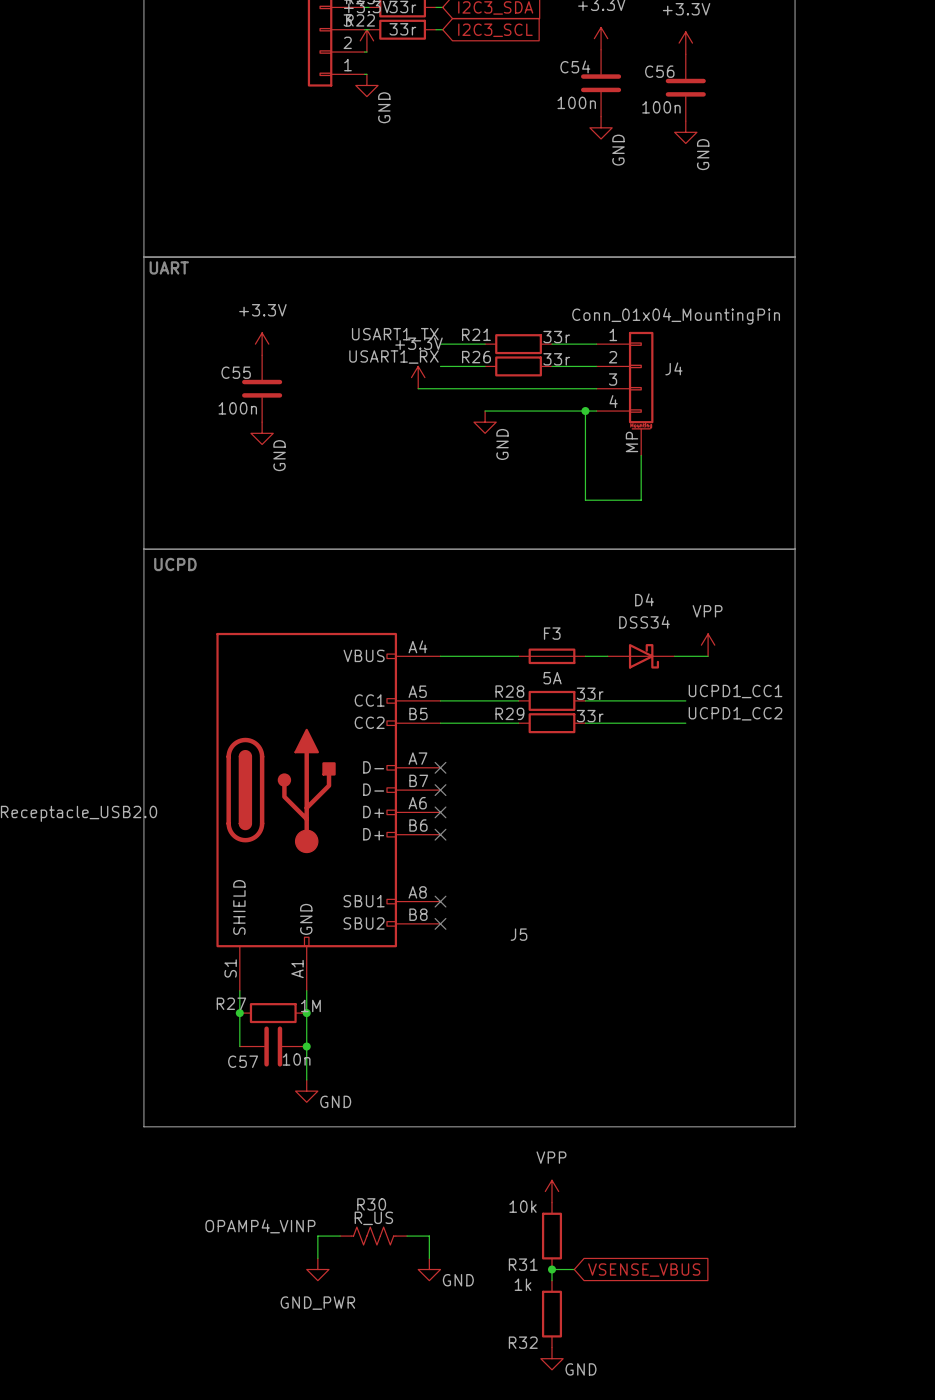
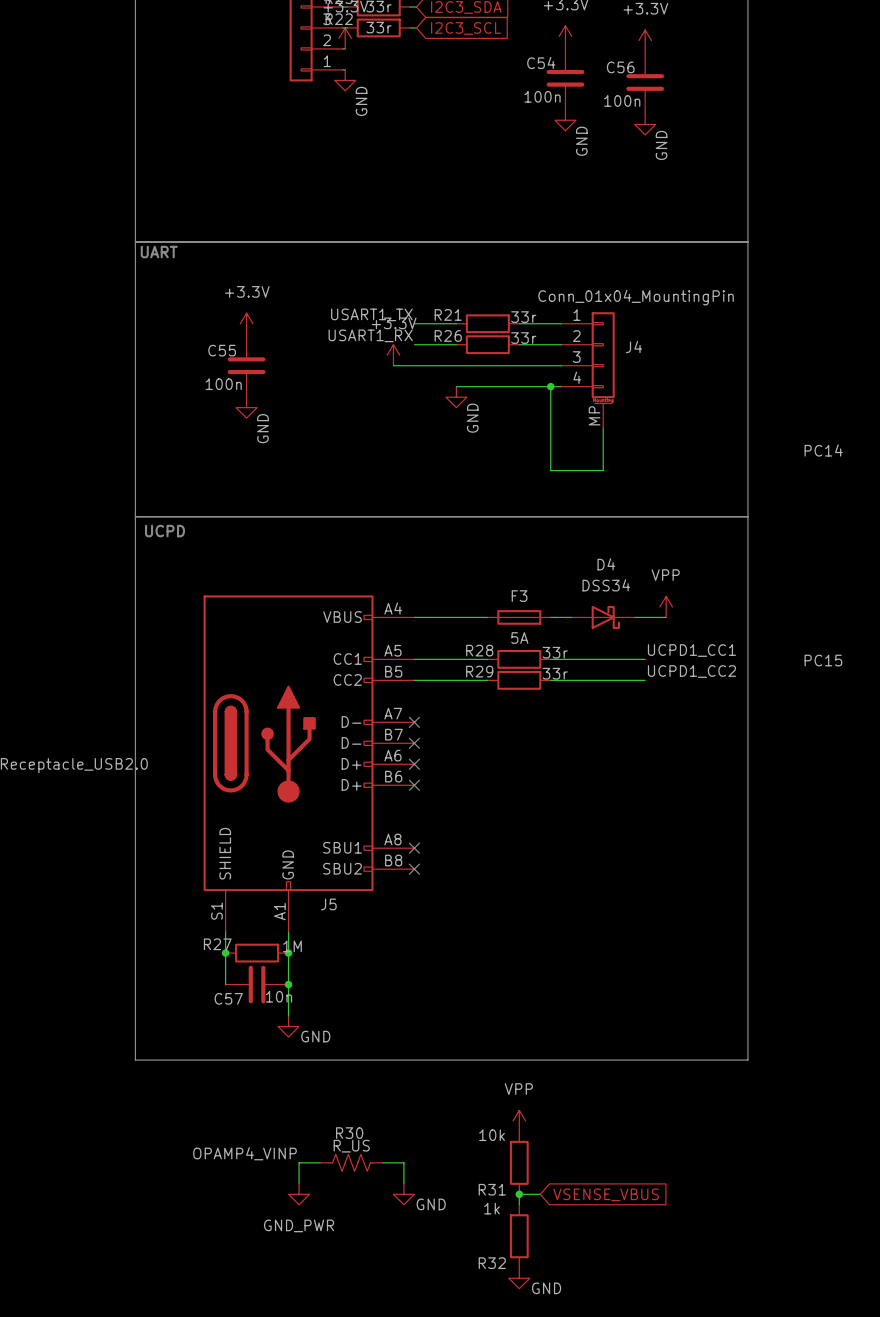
label: none -> PC14 (823, 450)
label: none -> PC15 (823, 660)
J5 name position: J5 (518, 934) -> J5 (328, 904)

